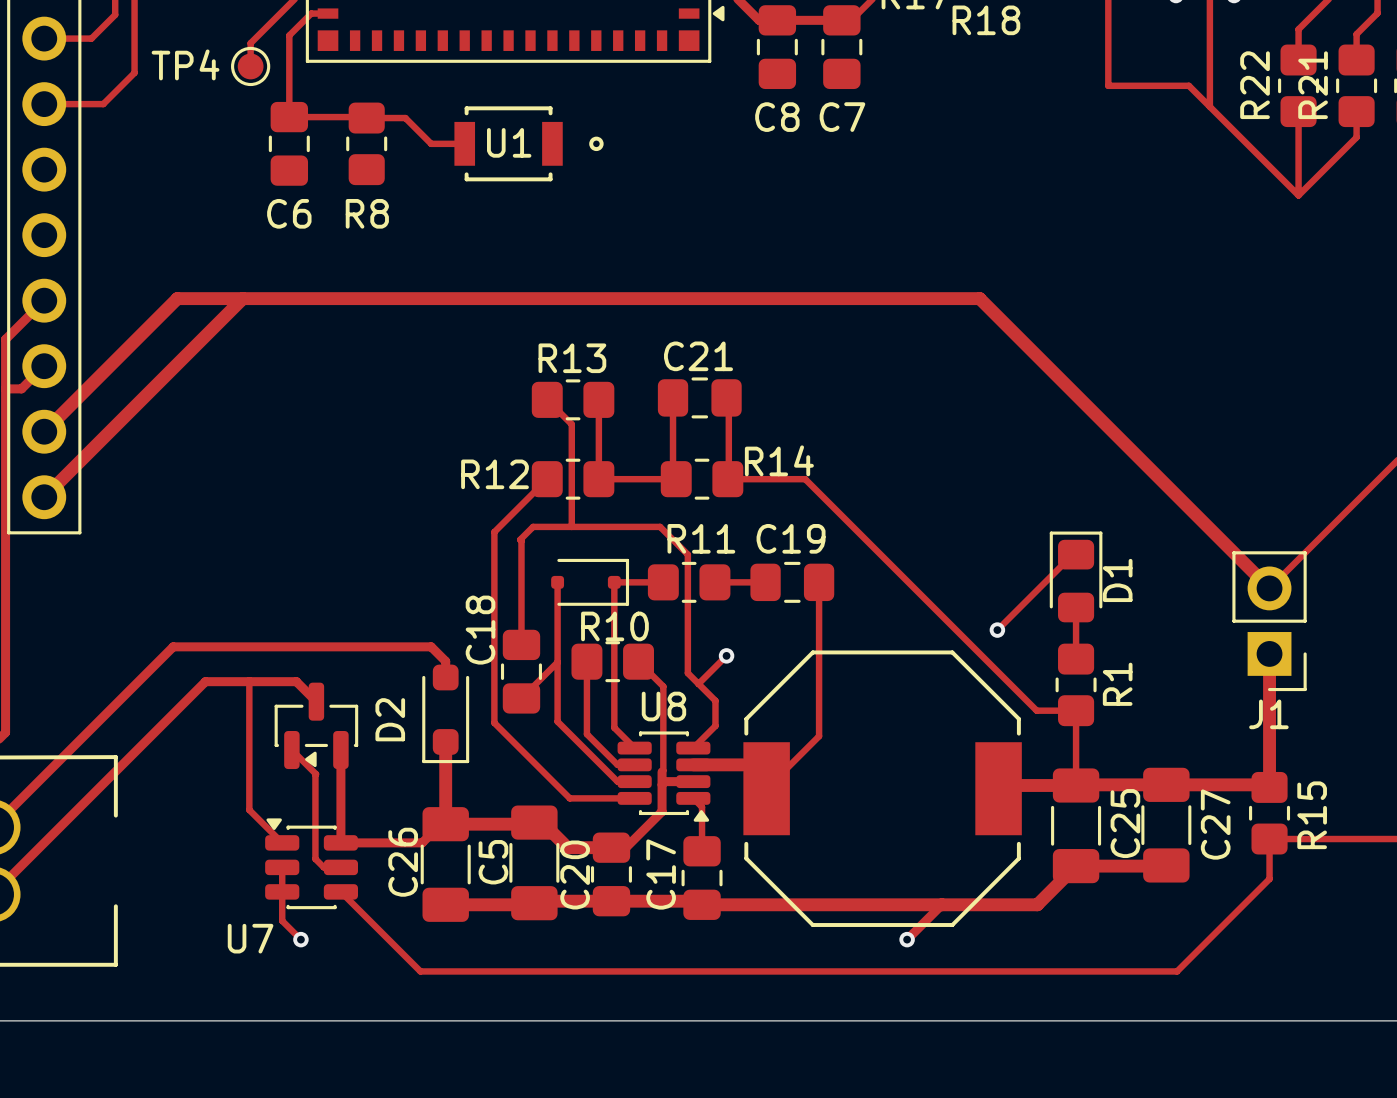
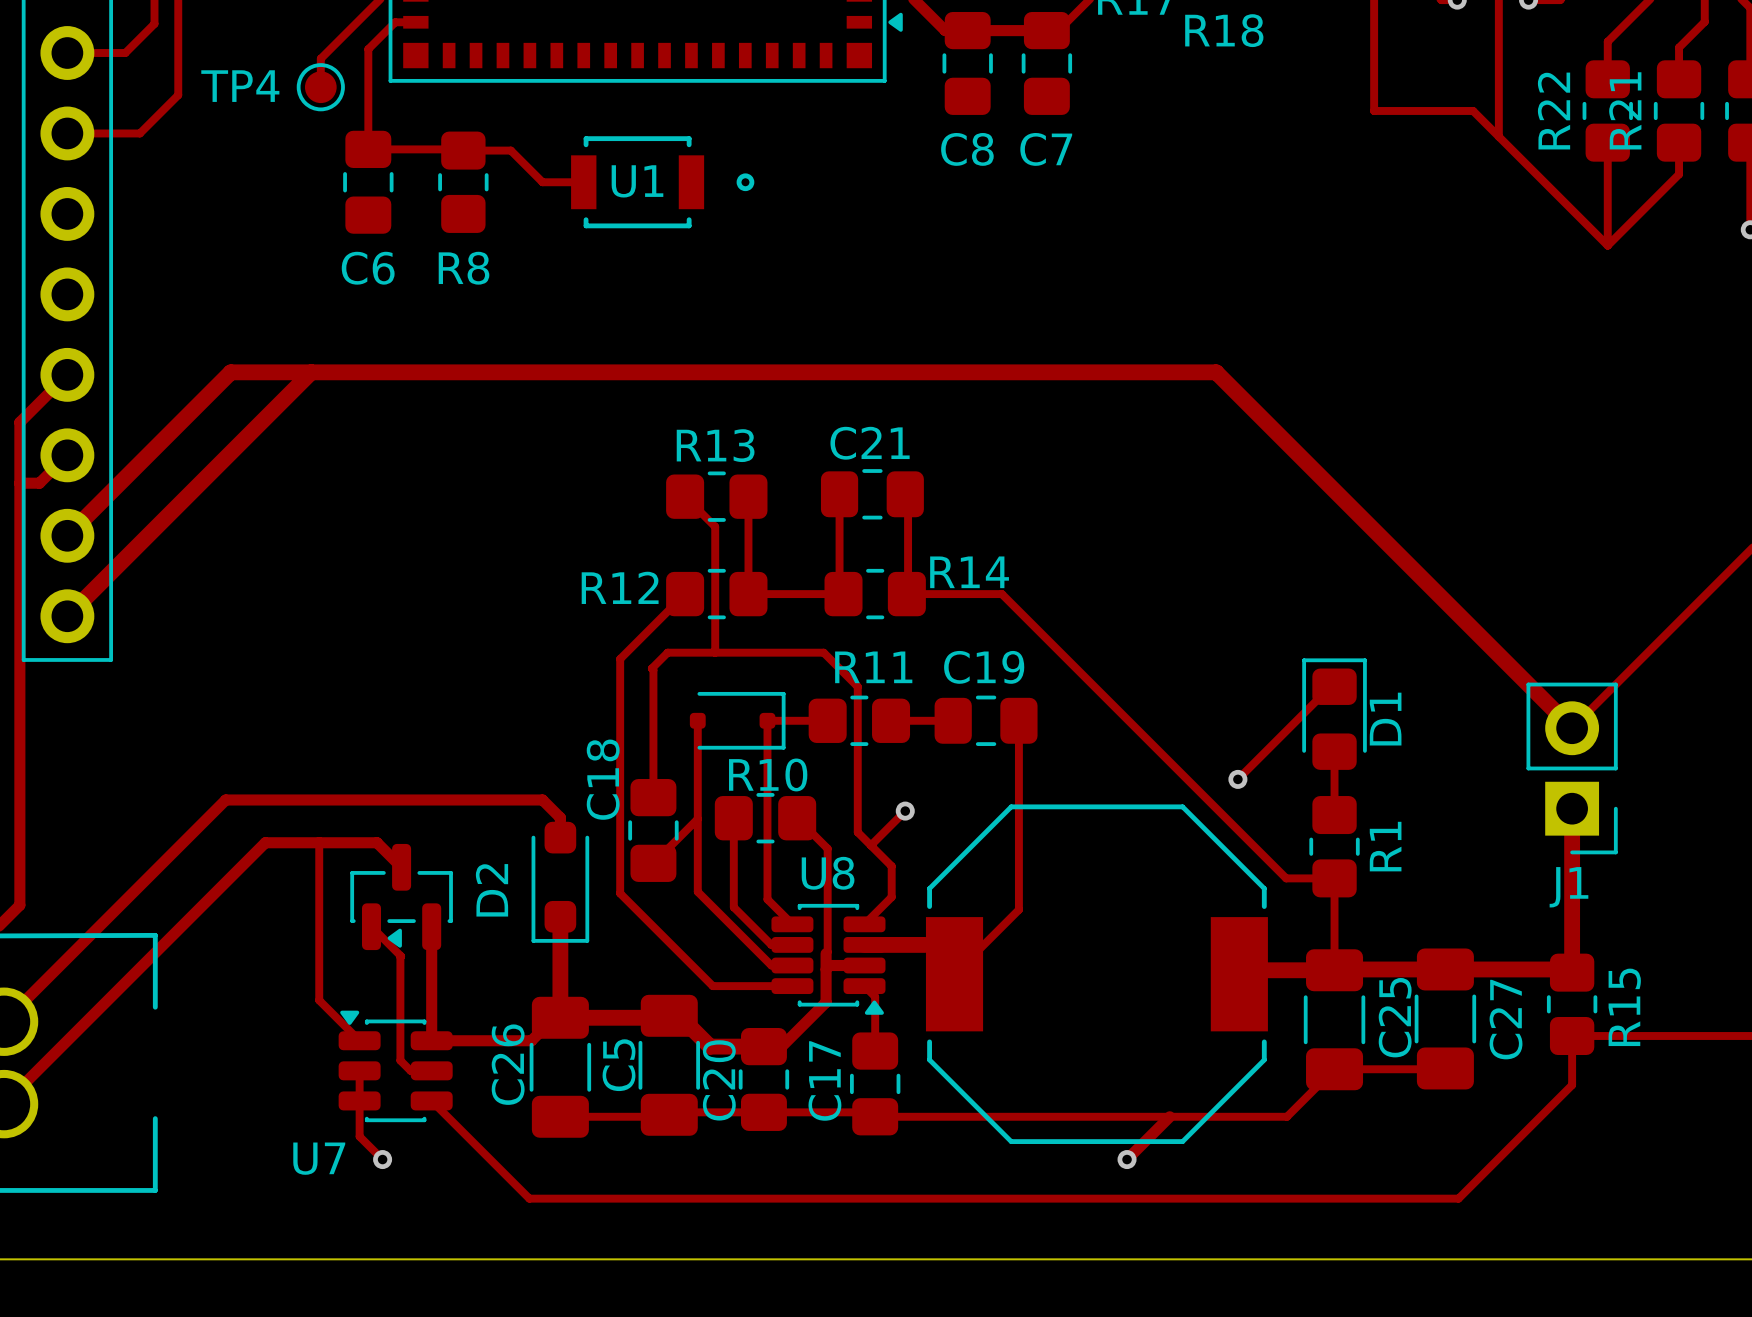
track width: thick (1165, 866) (1076, 866) (1037, 904) (702, 904) -> thin (1444, 1069) (1334, 1069) (1287, 1116) (875, 1116)
track width: thick (537, 901) (698, 901) -> thin (672, 1112) (870, 1112)
track width: thick (445, 904) (532, 904) -> thin (560, 1116) (667, 1116)

